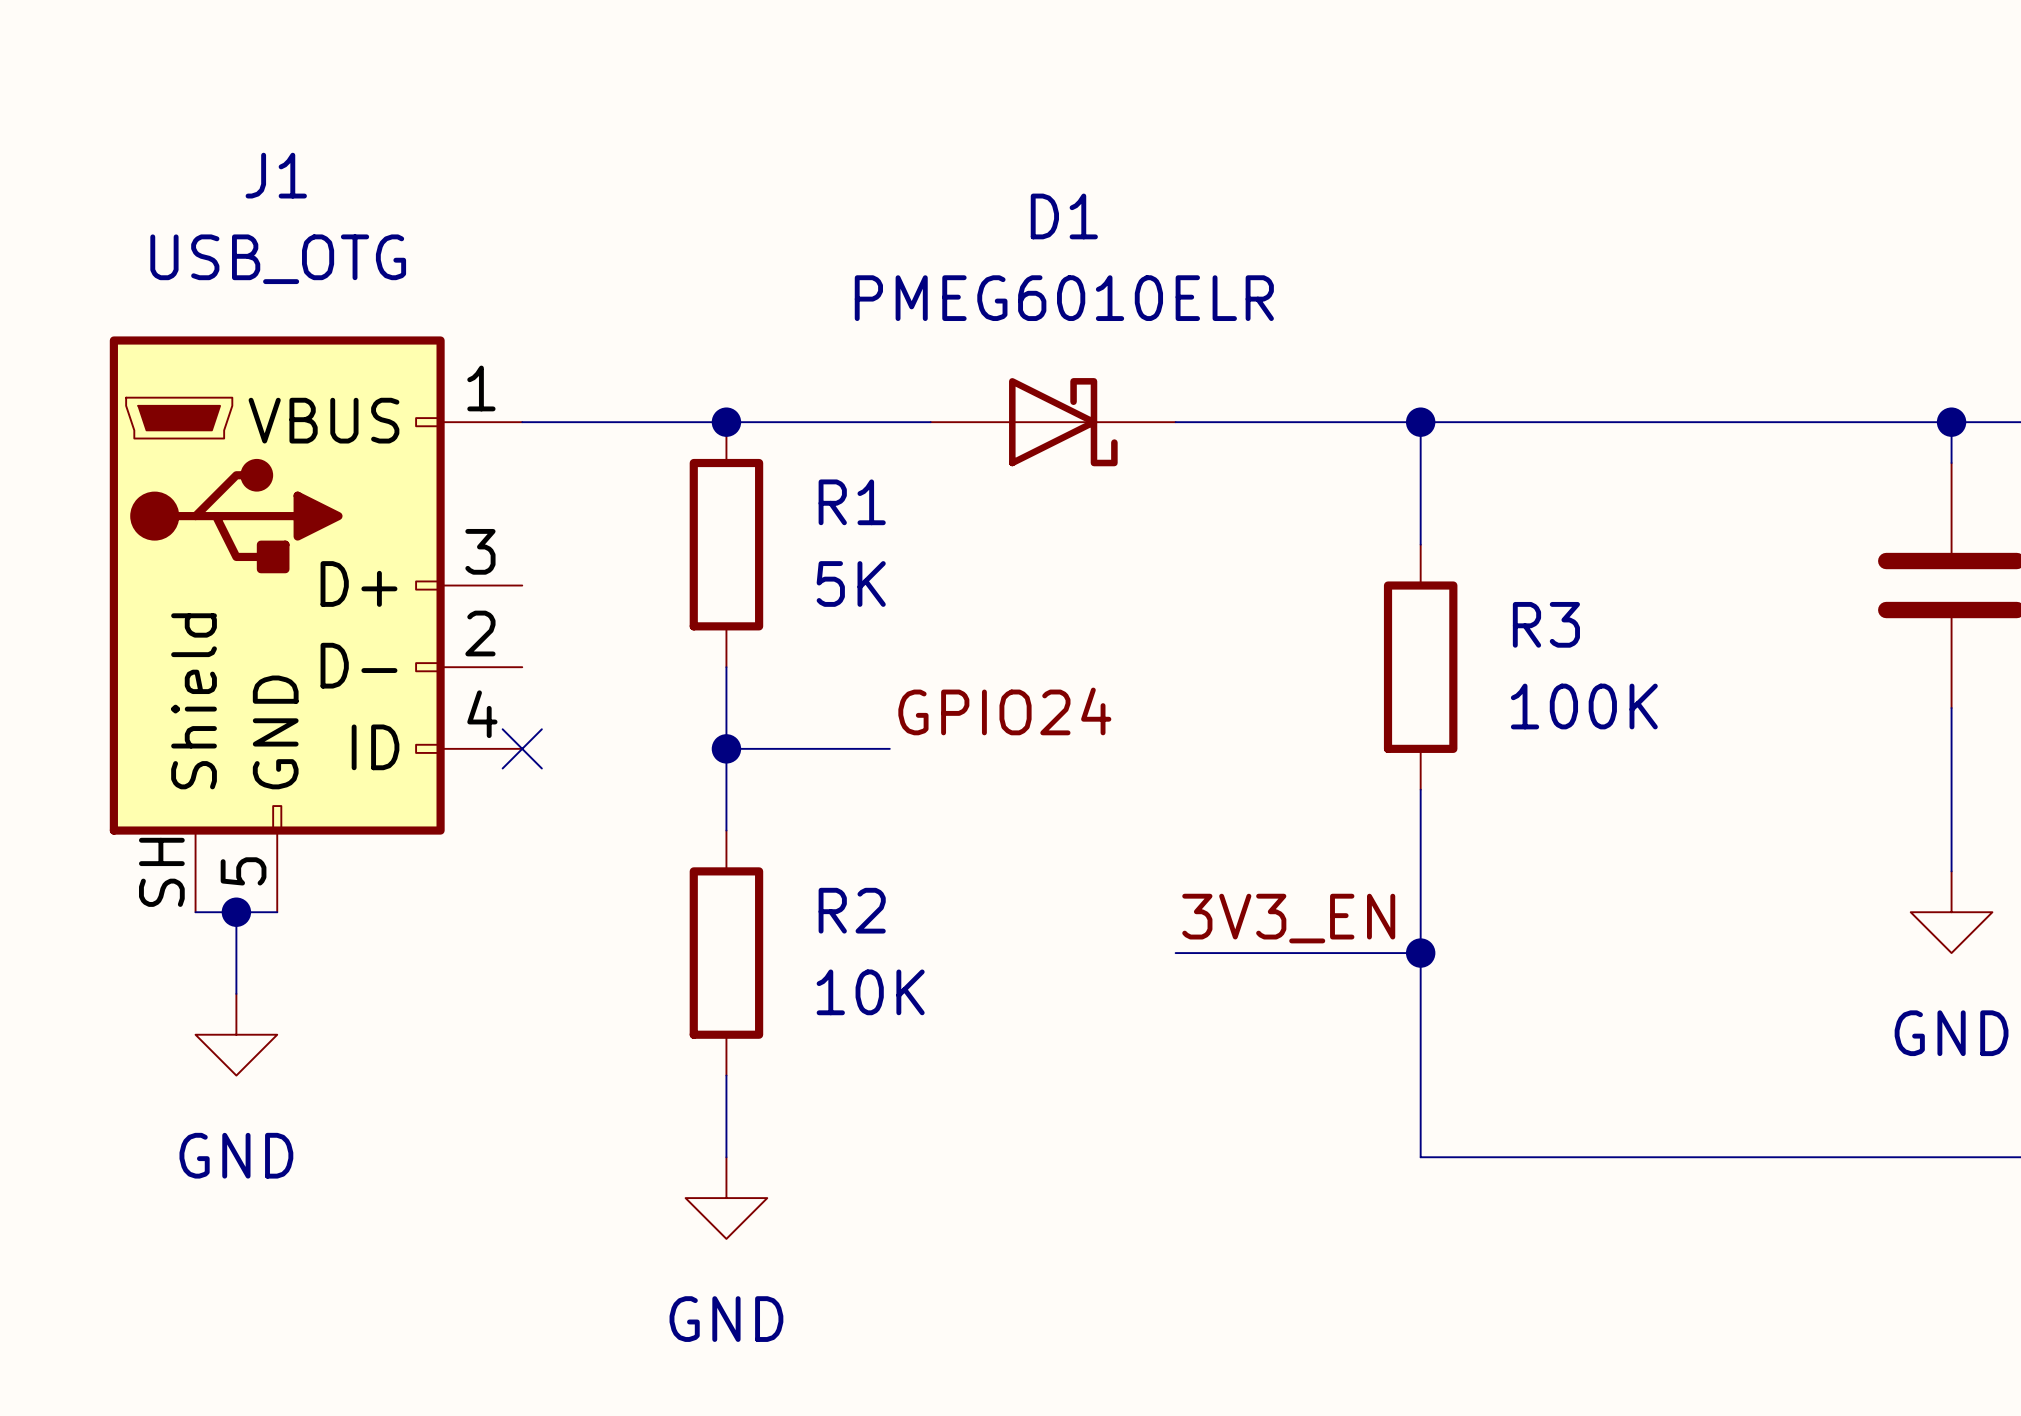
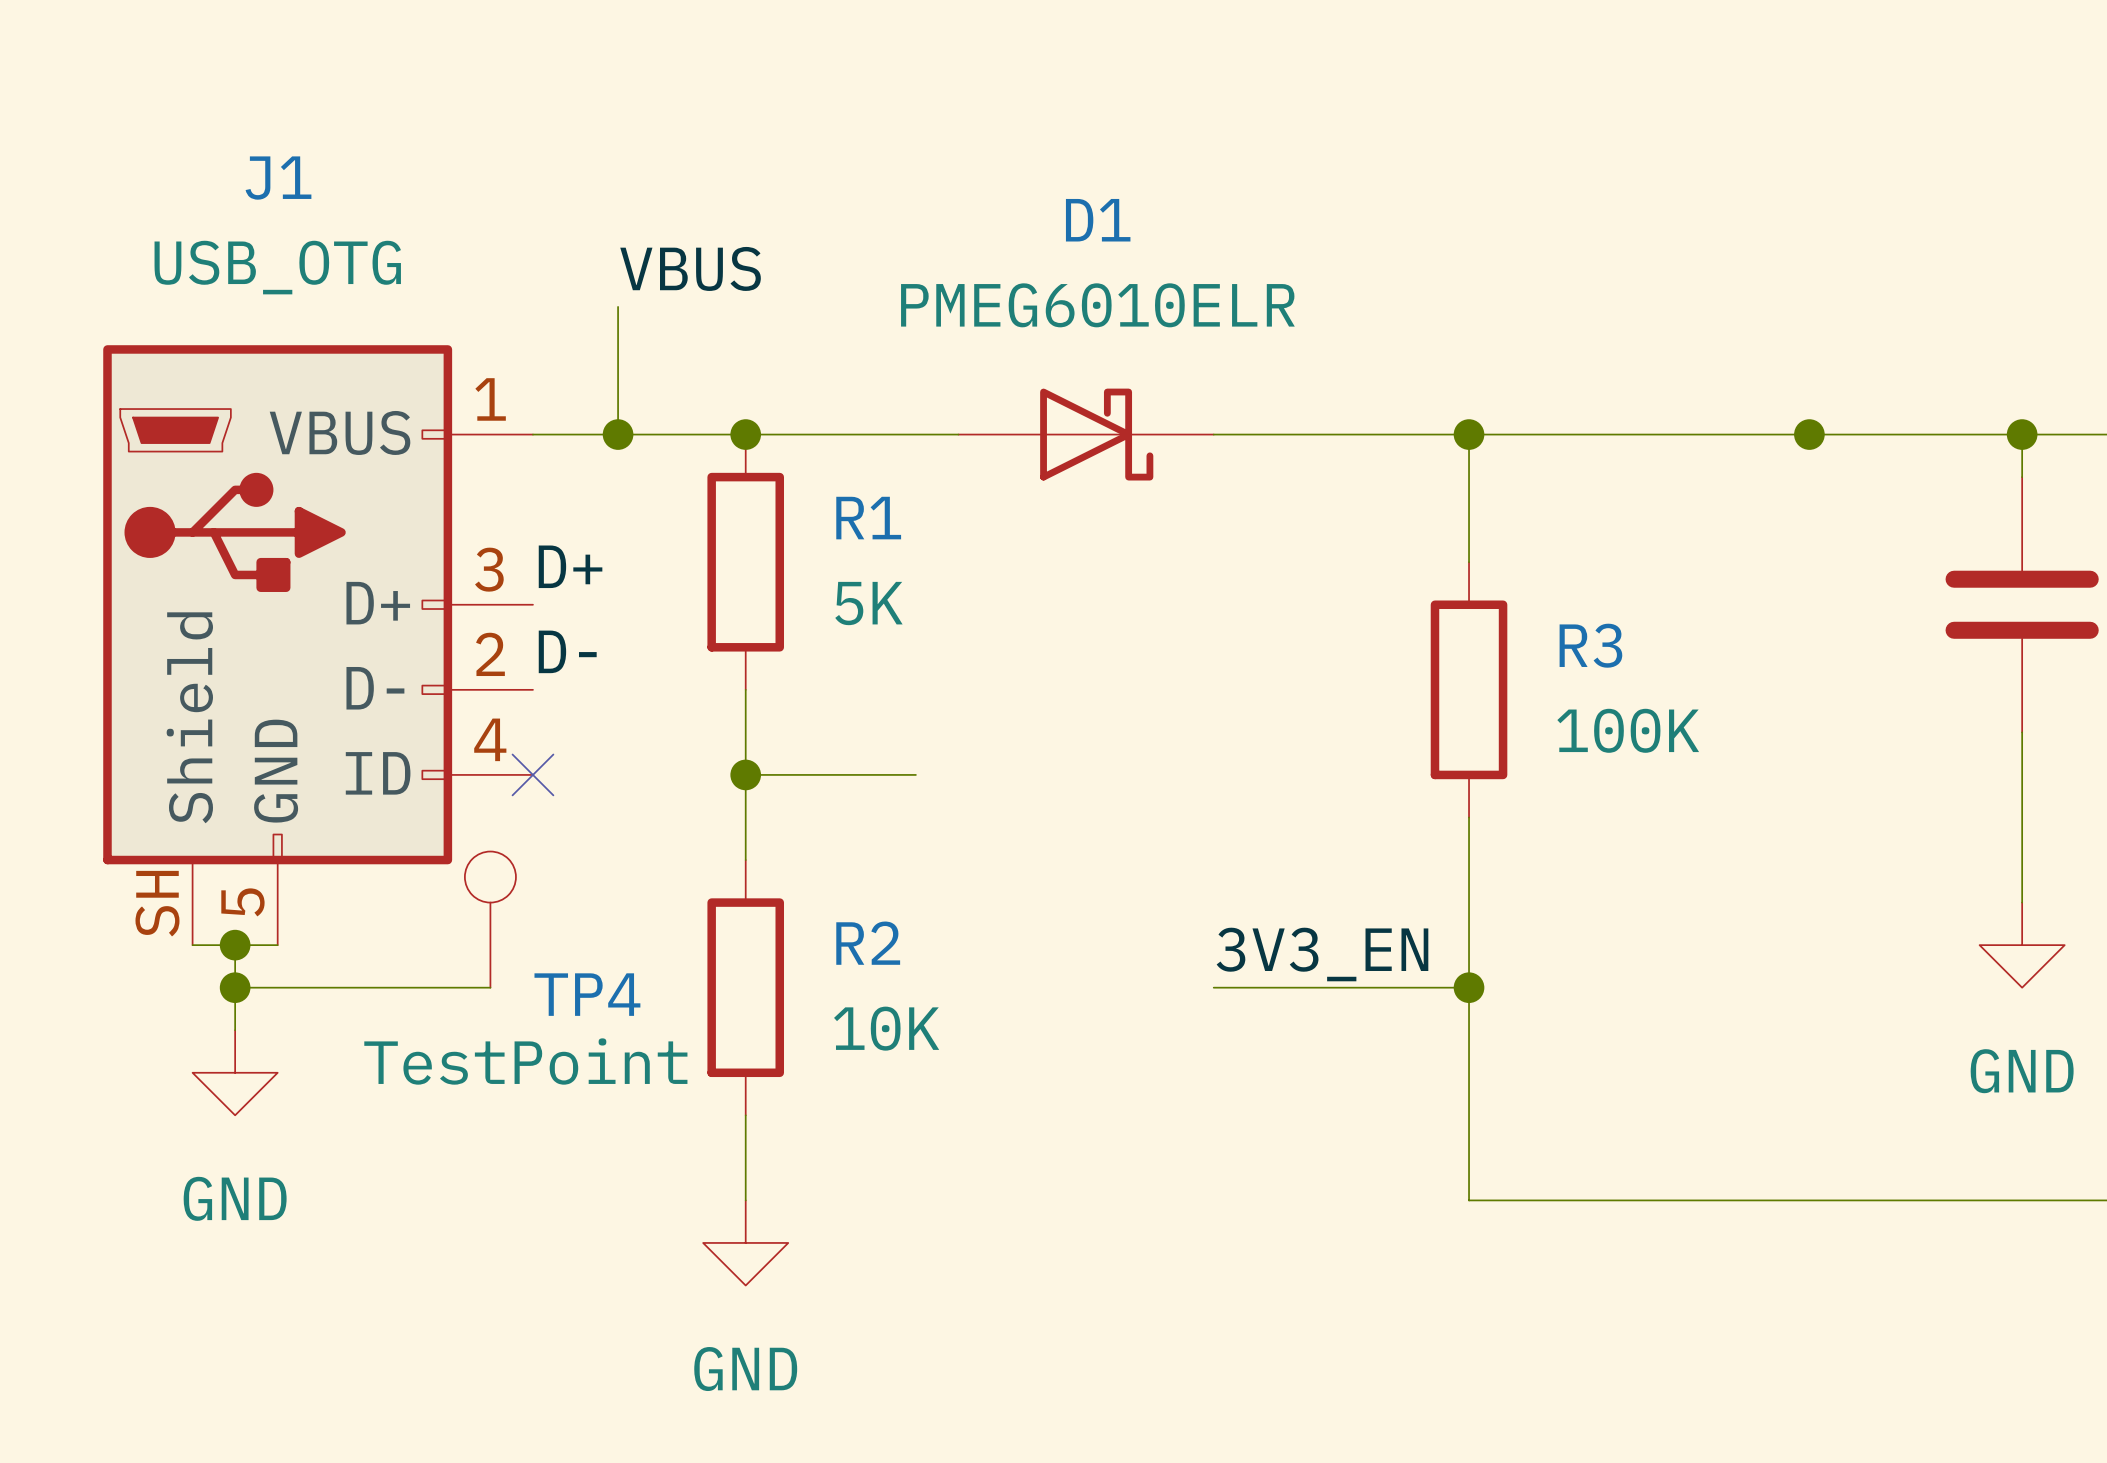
label: none -> VBUS (690, 268)
wire: none -> (618, 306) (618, 434)
junction: none -> (618, 434)
junction: none -> (1809, 434)
label: none -> D+ (570, 566)
label: none -> D- (567, 651)
label: GPIO24 (1004, 711) -> none
TP4: none -> TestPoint (490, 919)
wire: none -> (235, 987) (490, 987)
junction: none -> (235, 987)

